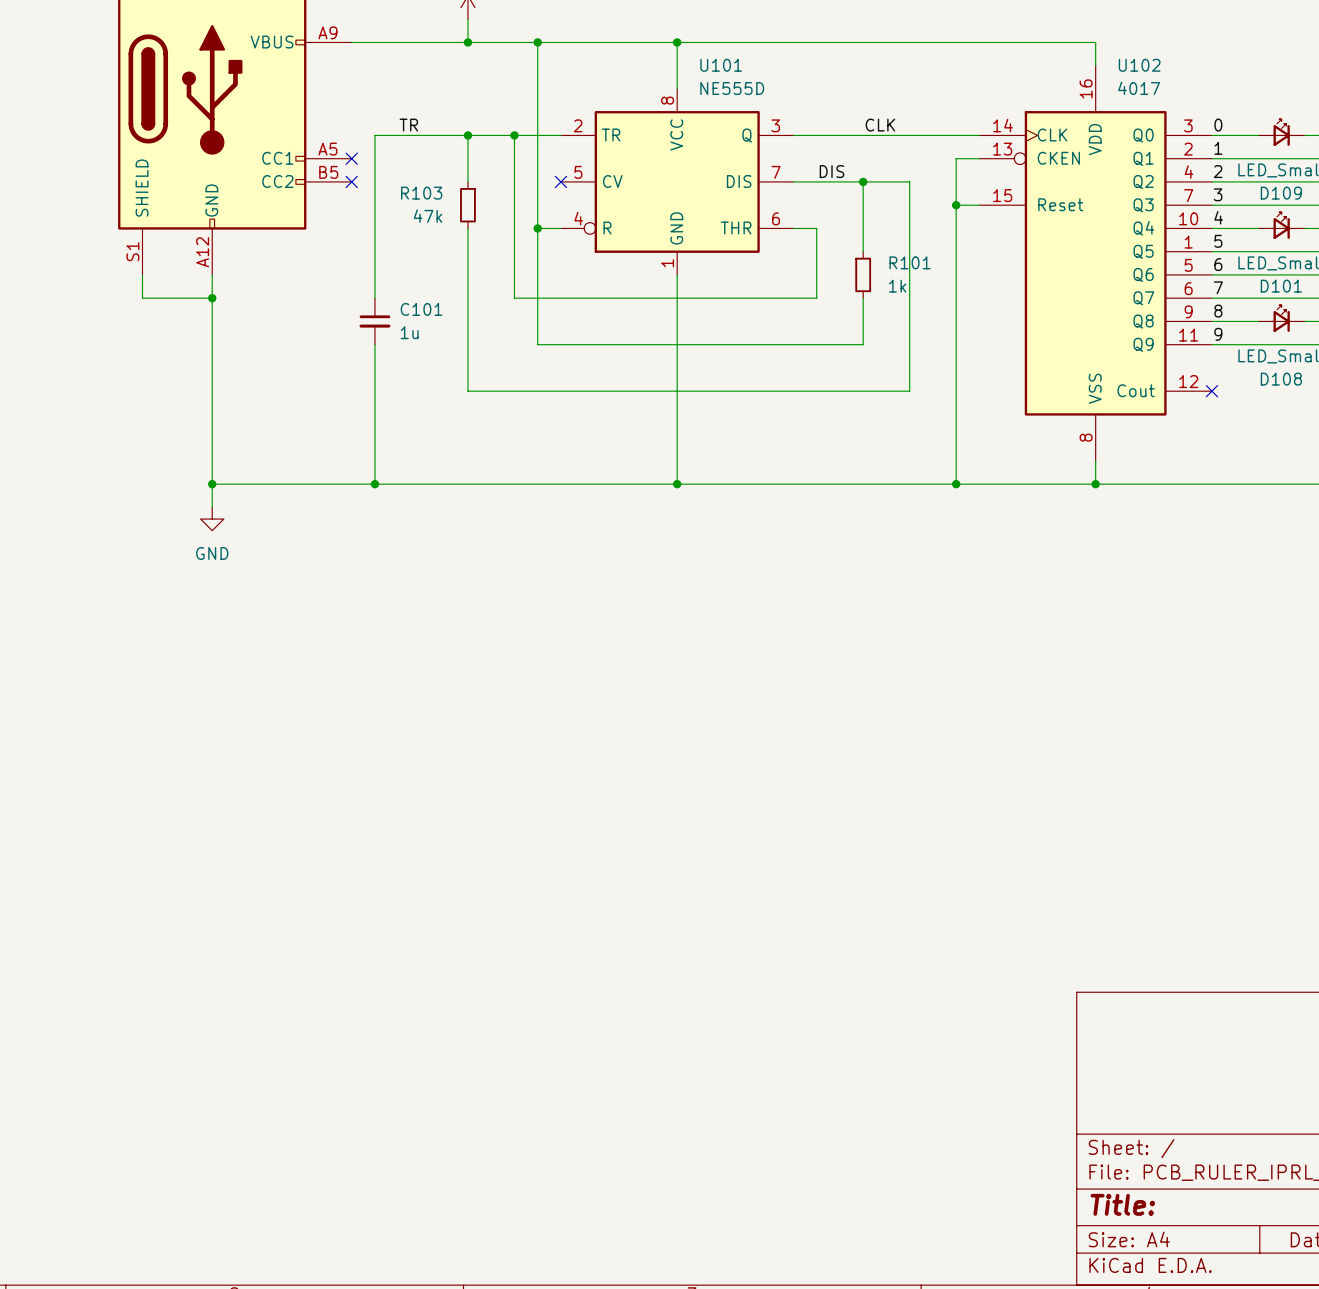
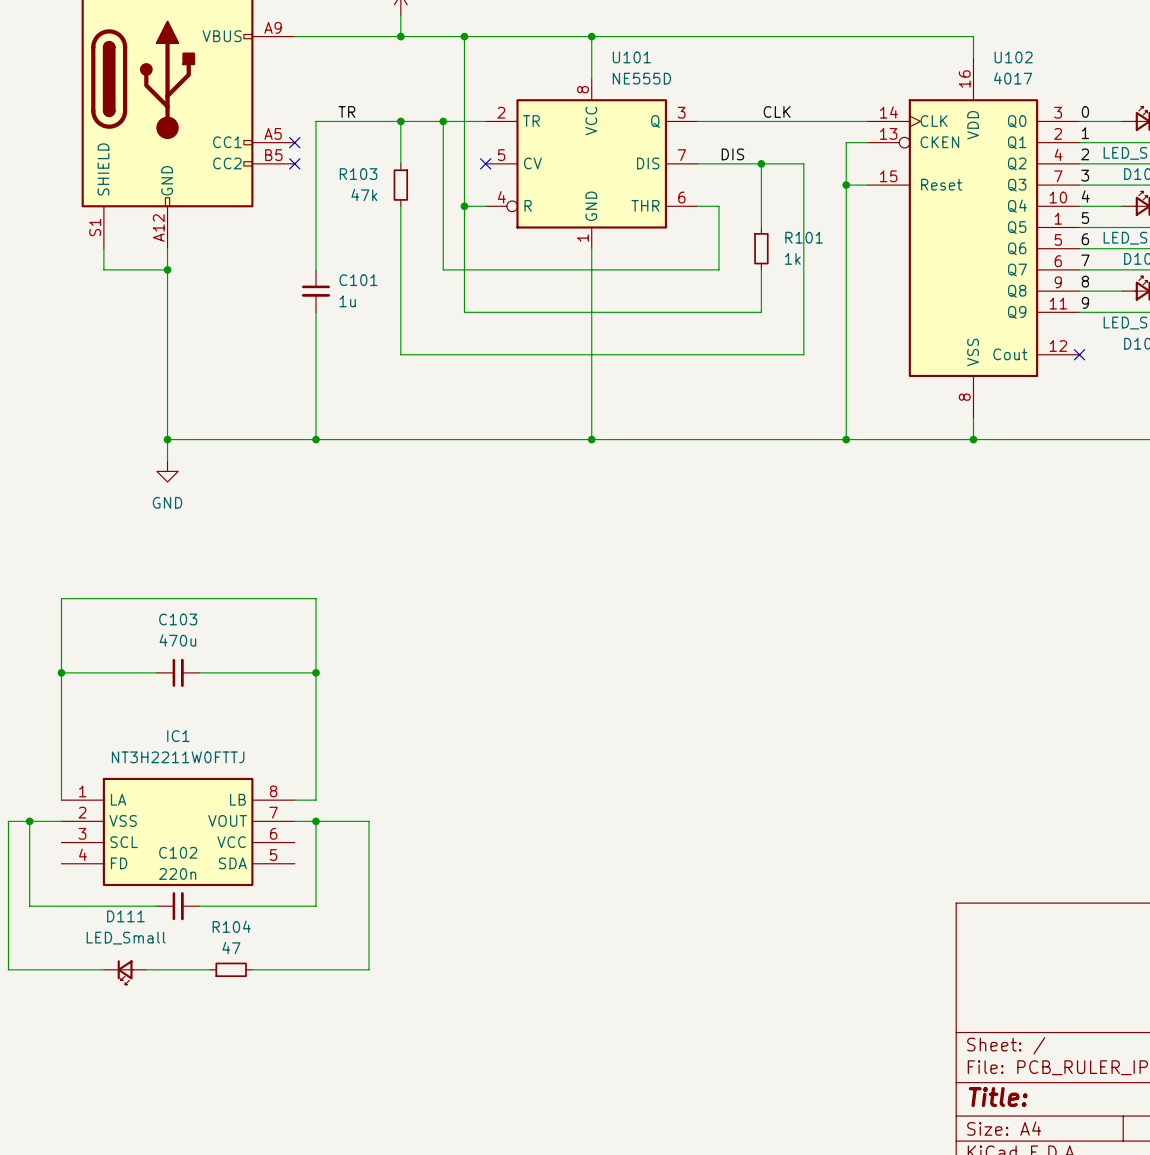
wire: none -> (61, 672) (156, 672)
junction: none -> (61, 672)
C103: none -> 470u (178, 672)
wire: none -> (199, 672) (315, 672)
junction: none -> (315, 672)
wire: none -> (61, 800) (61, 598) (315, 598) (315, 800) (294, 800)
wire: none -> (29, 821) (29, 906) (156, 906)
junction: none -> (29, 821)
wire: none -> (61, 821) (8, 821) (8, 969) (103, 969)
wire: none -> (294, 821) (369, 821) (369, 969) (252, 969)
wire: none -> (315, 821) (315, 906) (199, 906)
junction: none -> (315, 821)
IC1: none -> NT3H2211W0FTTJ (178, 831)
C102: none -> 220n (178, 906)
wire: none -> (146, 969) (209, 969)
R104: none -> 47 (231, 969)
D111: none -> LED_Small (125, 972)

